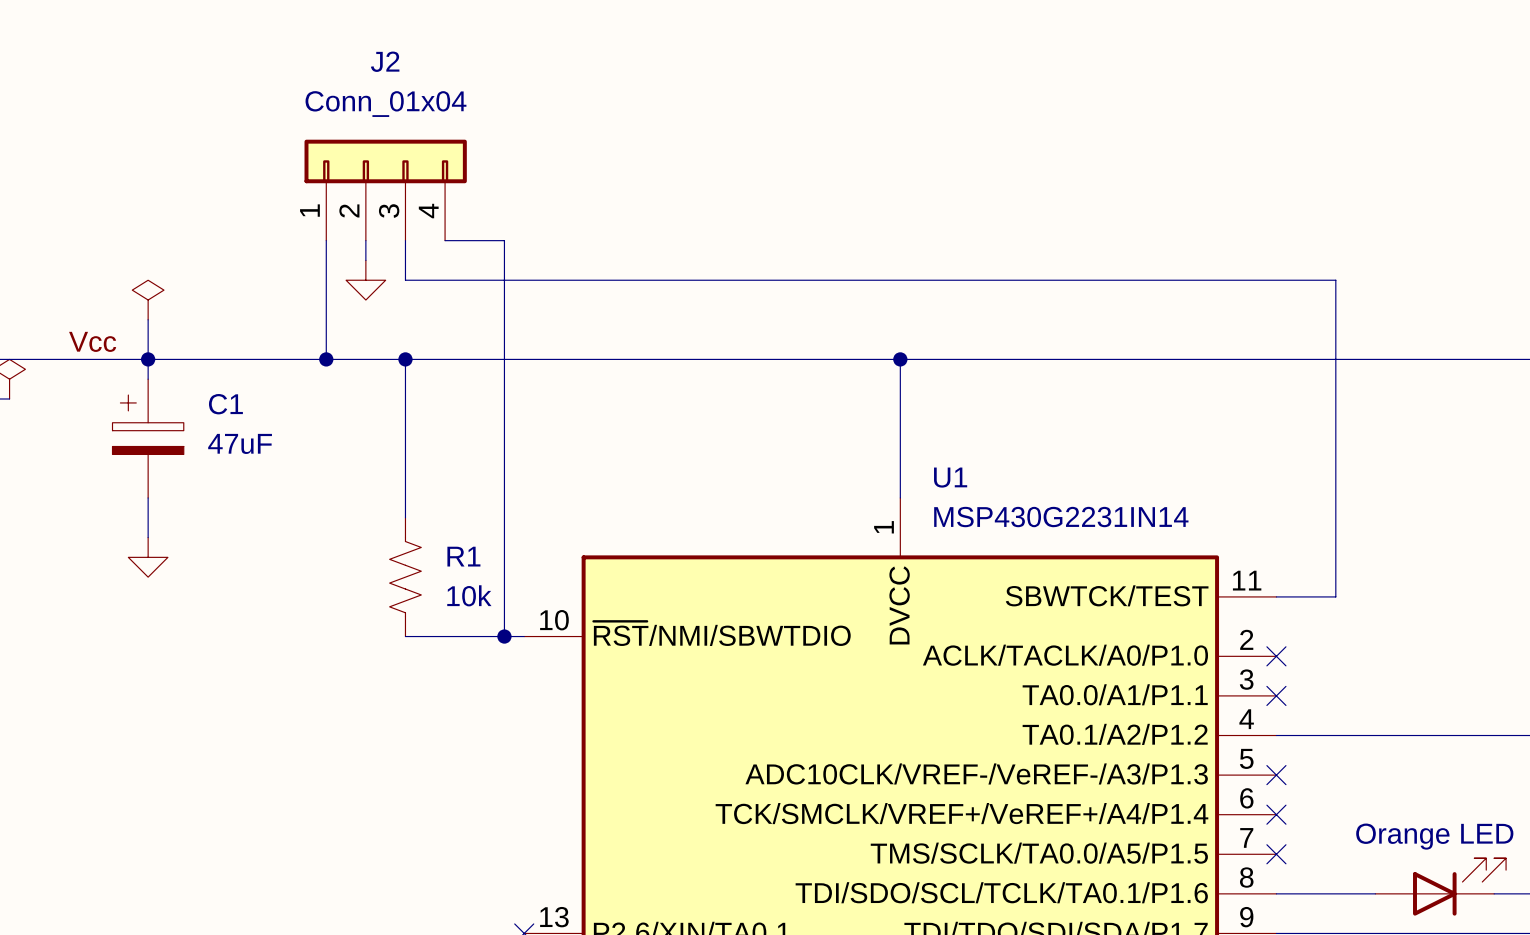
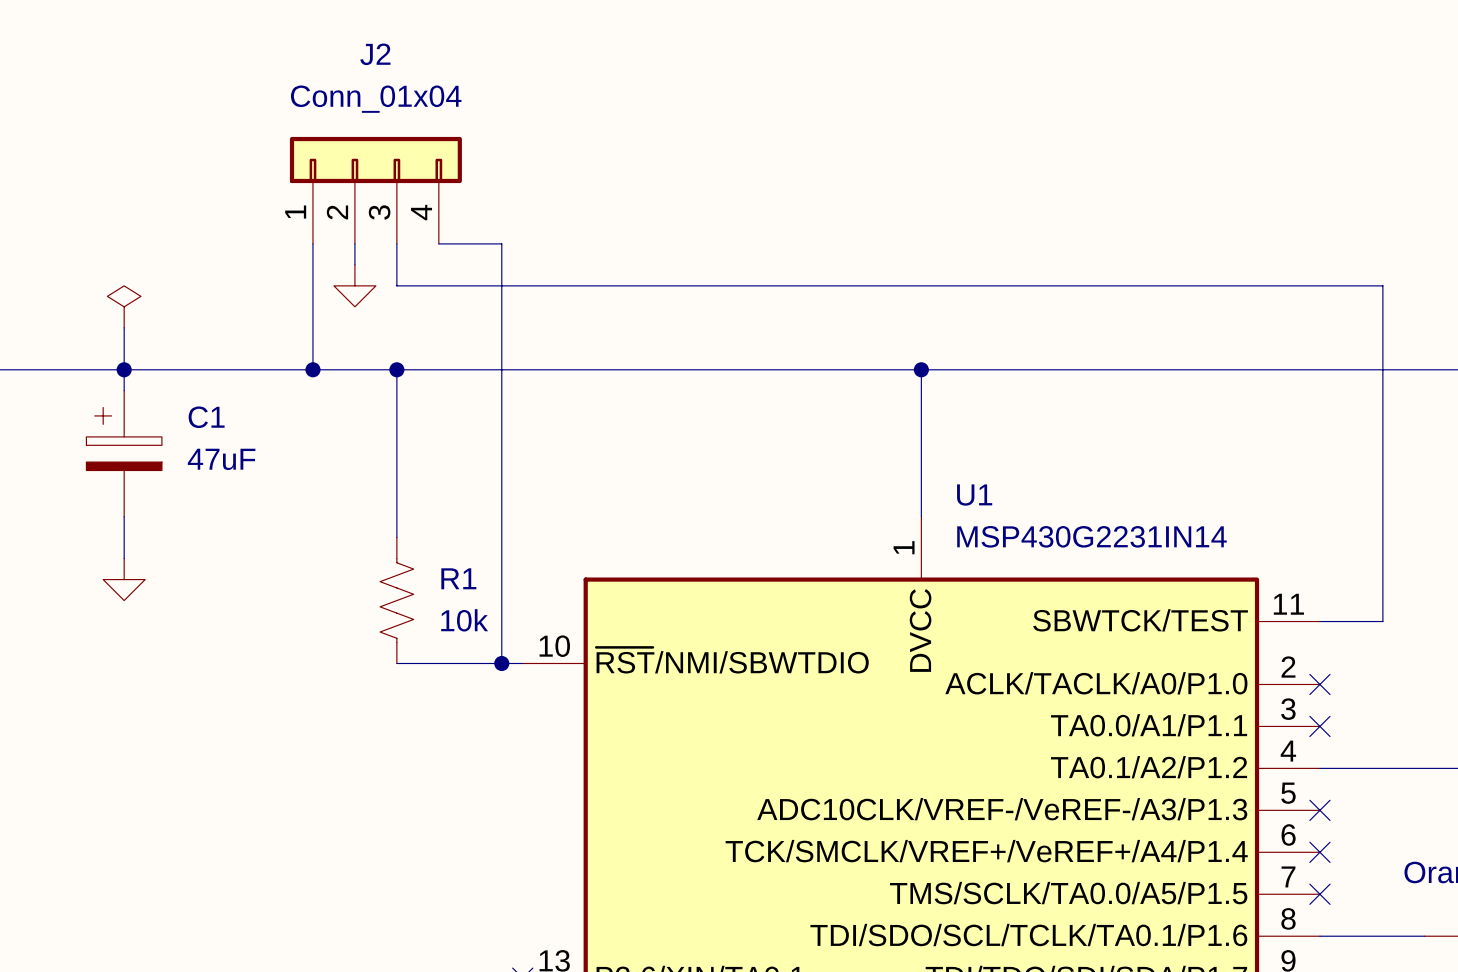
label: Vcc (92, 341) -> none

